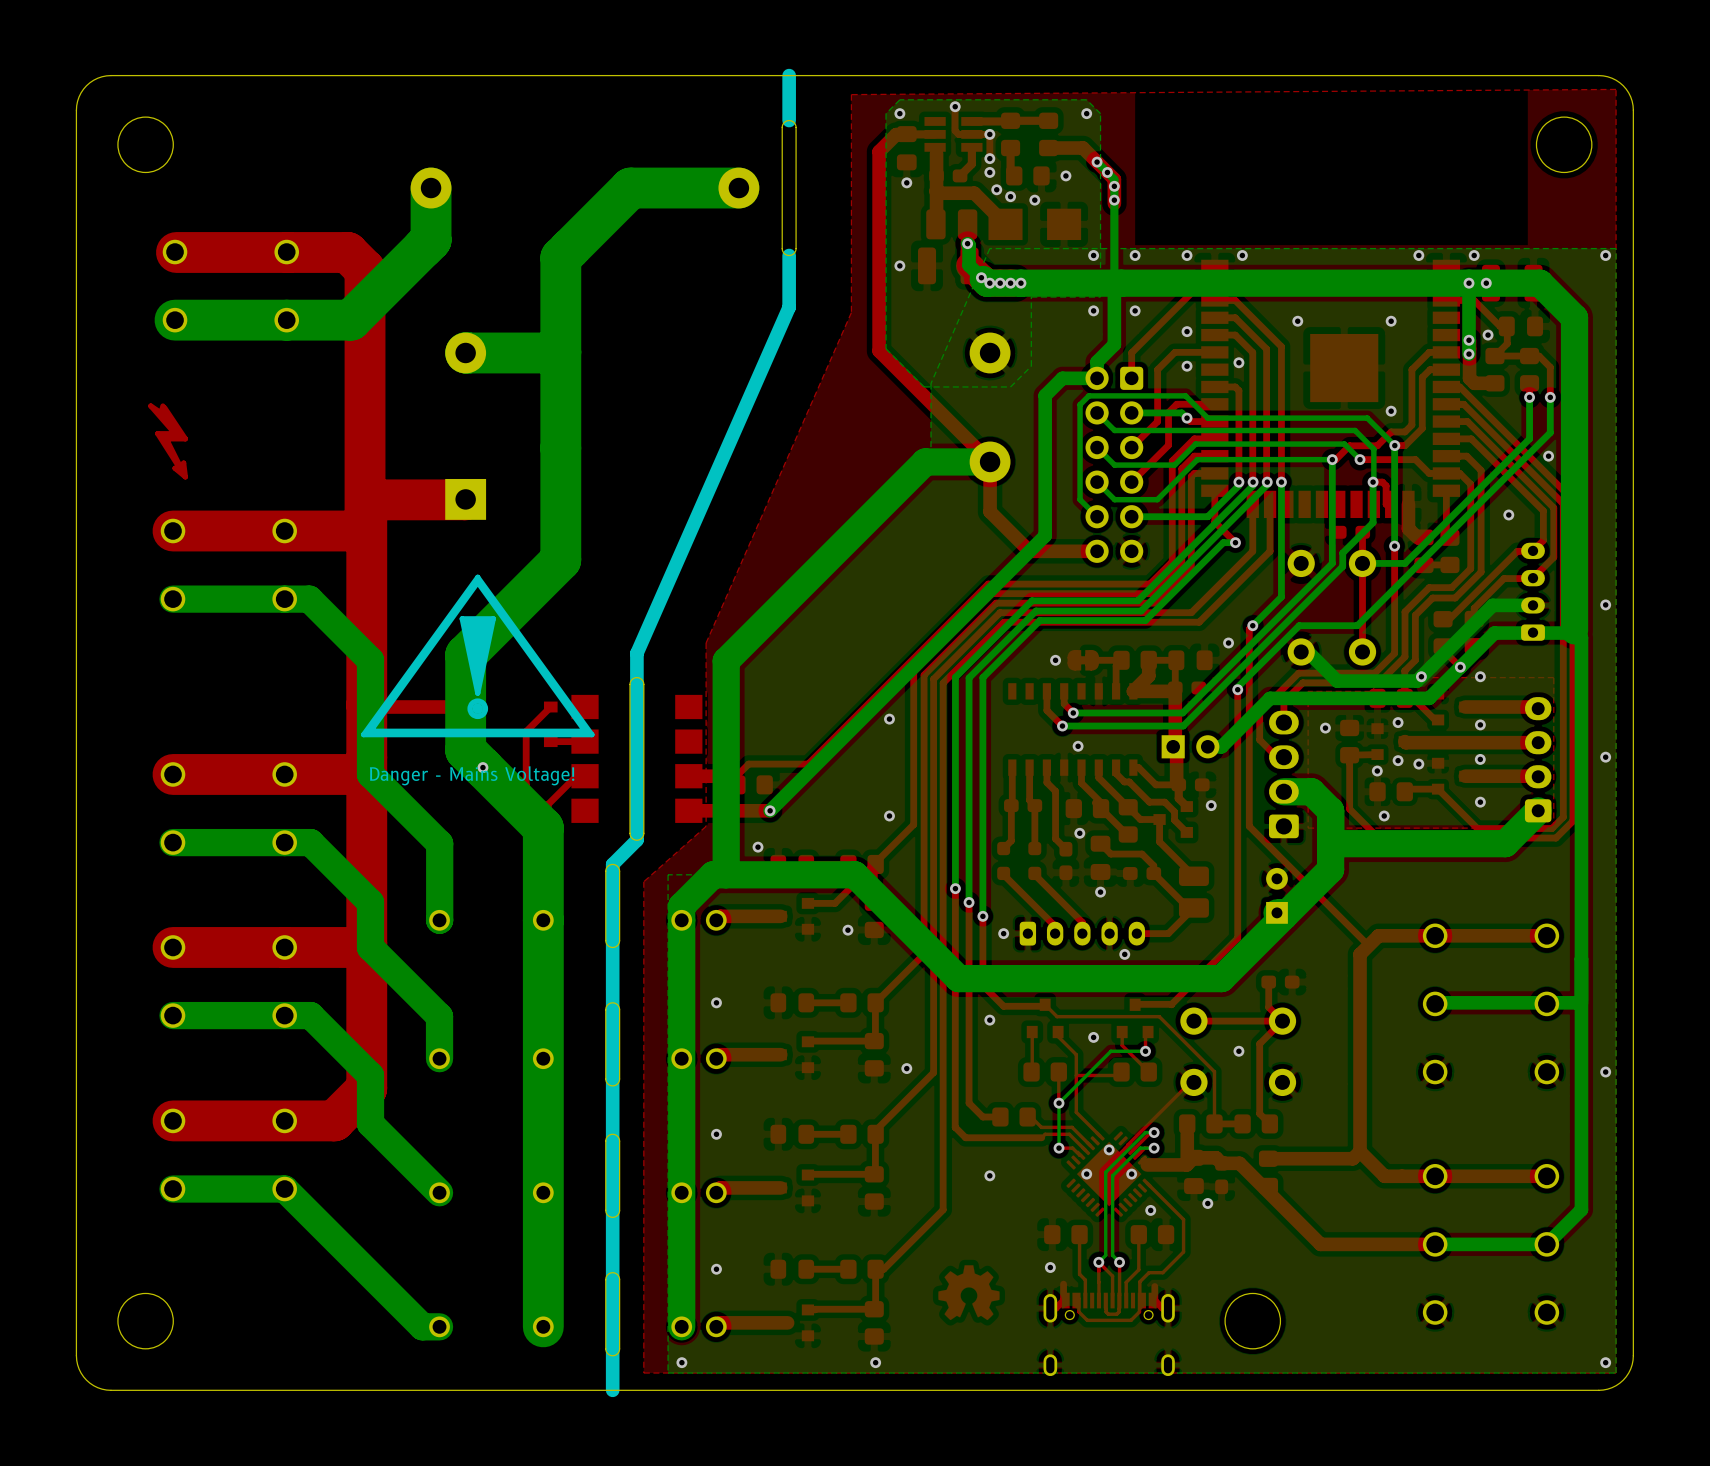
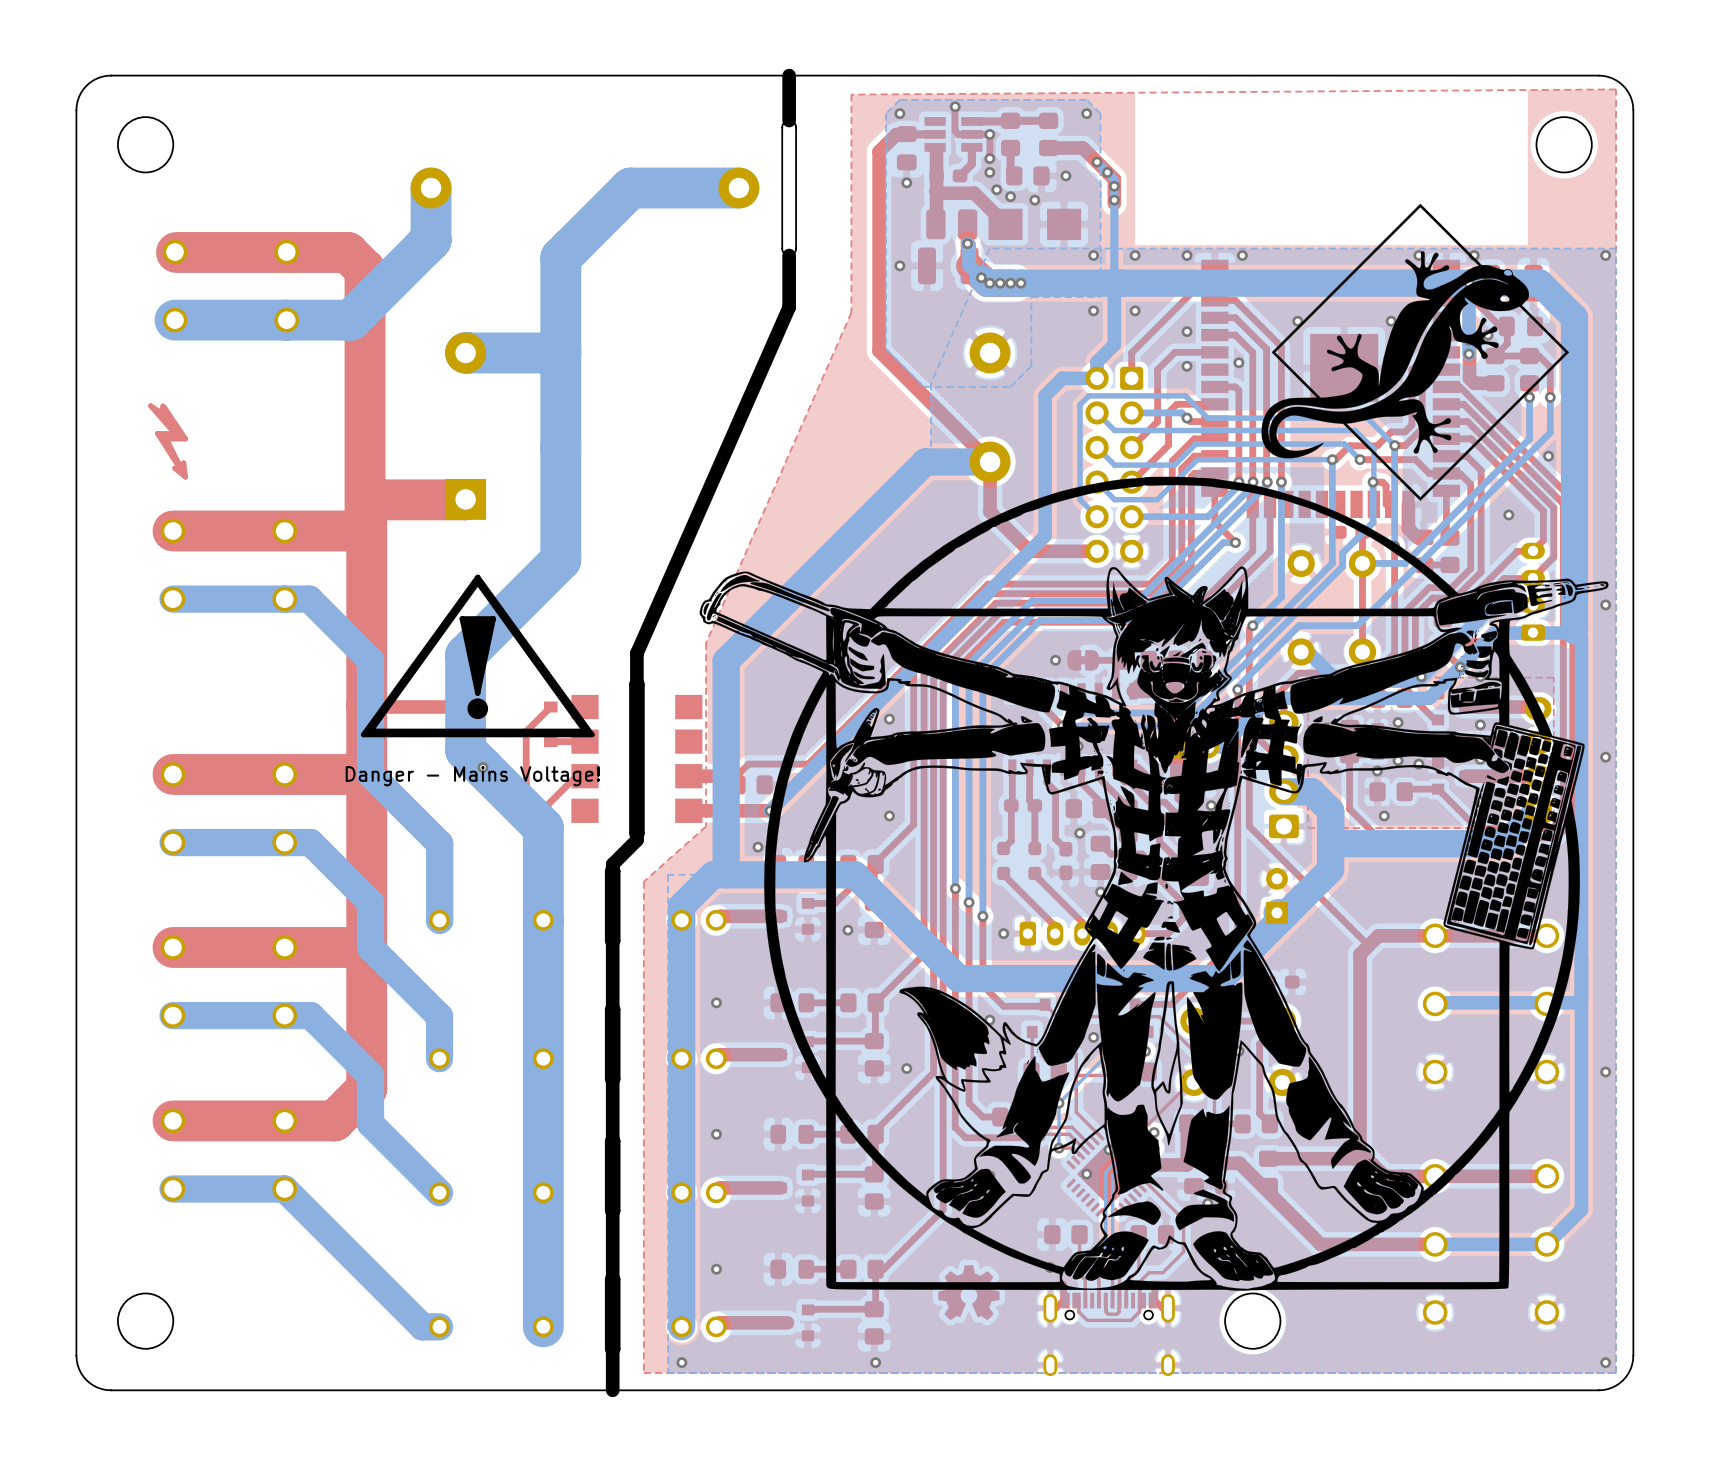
drawing: none -> [699, 203, 1609, 1291]

